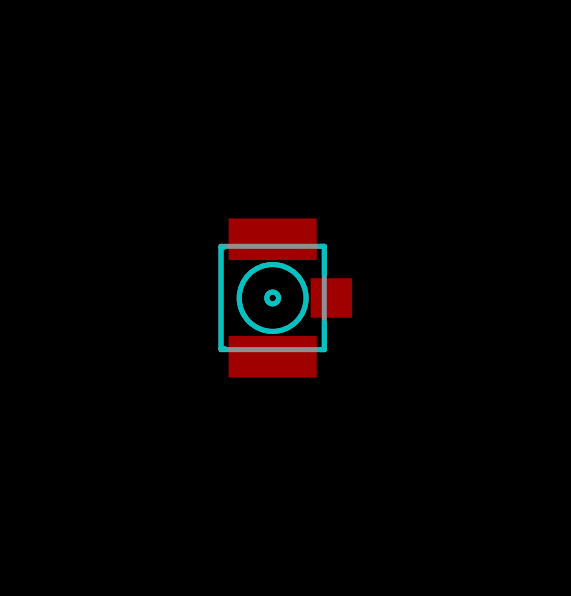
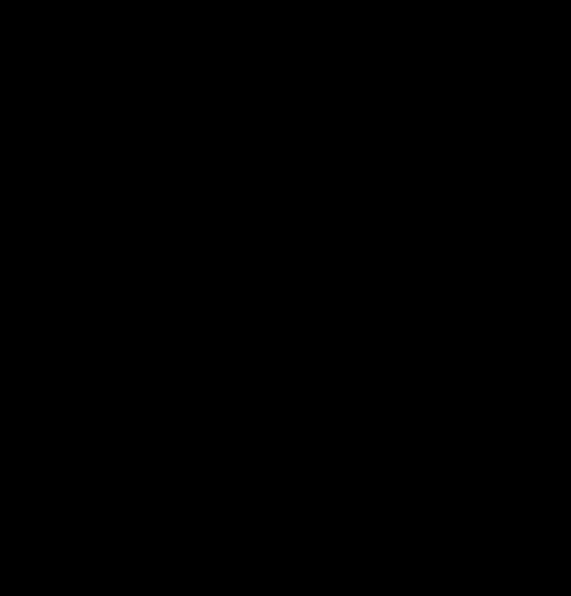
part: (285, 297) -> none

